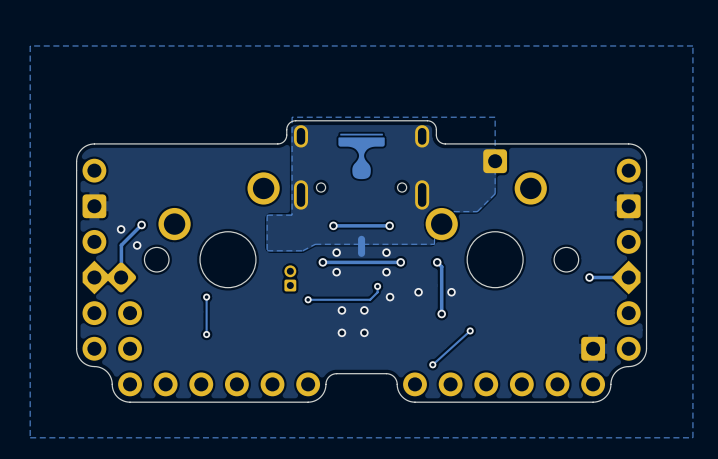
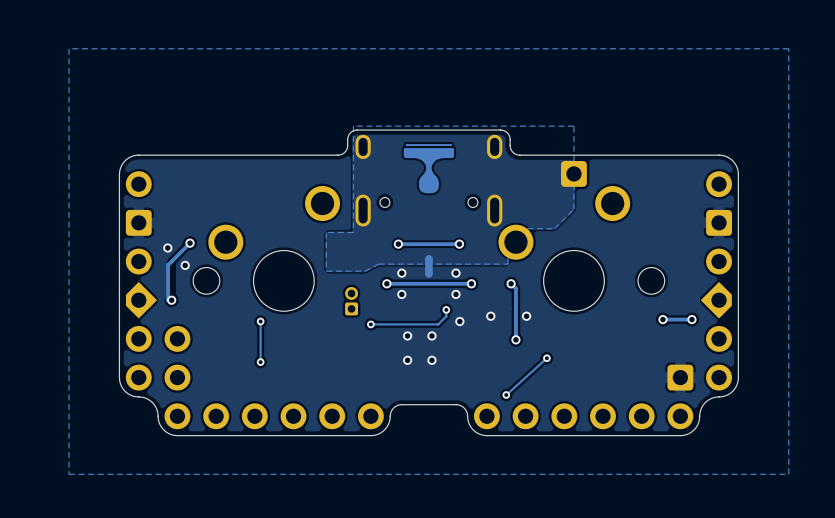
part footprint: [76, 158, 647, 403] -> [119, 171, 739, 437]
via: none -> (171, 300)
via: (589, 277) -> none
track: (628, 277) (589, 277) -> none
via: none -> (662, 319)
track: none -> (691, 319) (662, 319)
via: none -> (691, 319)

